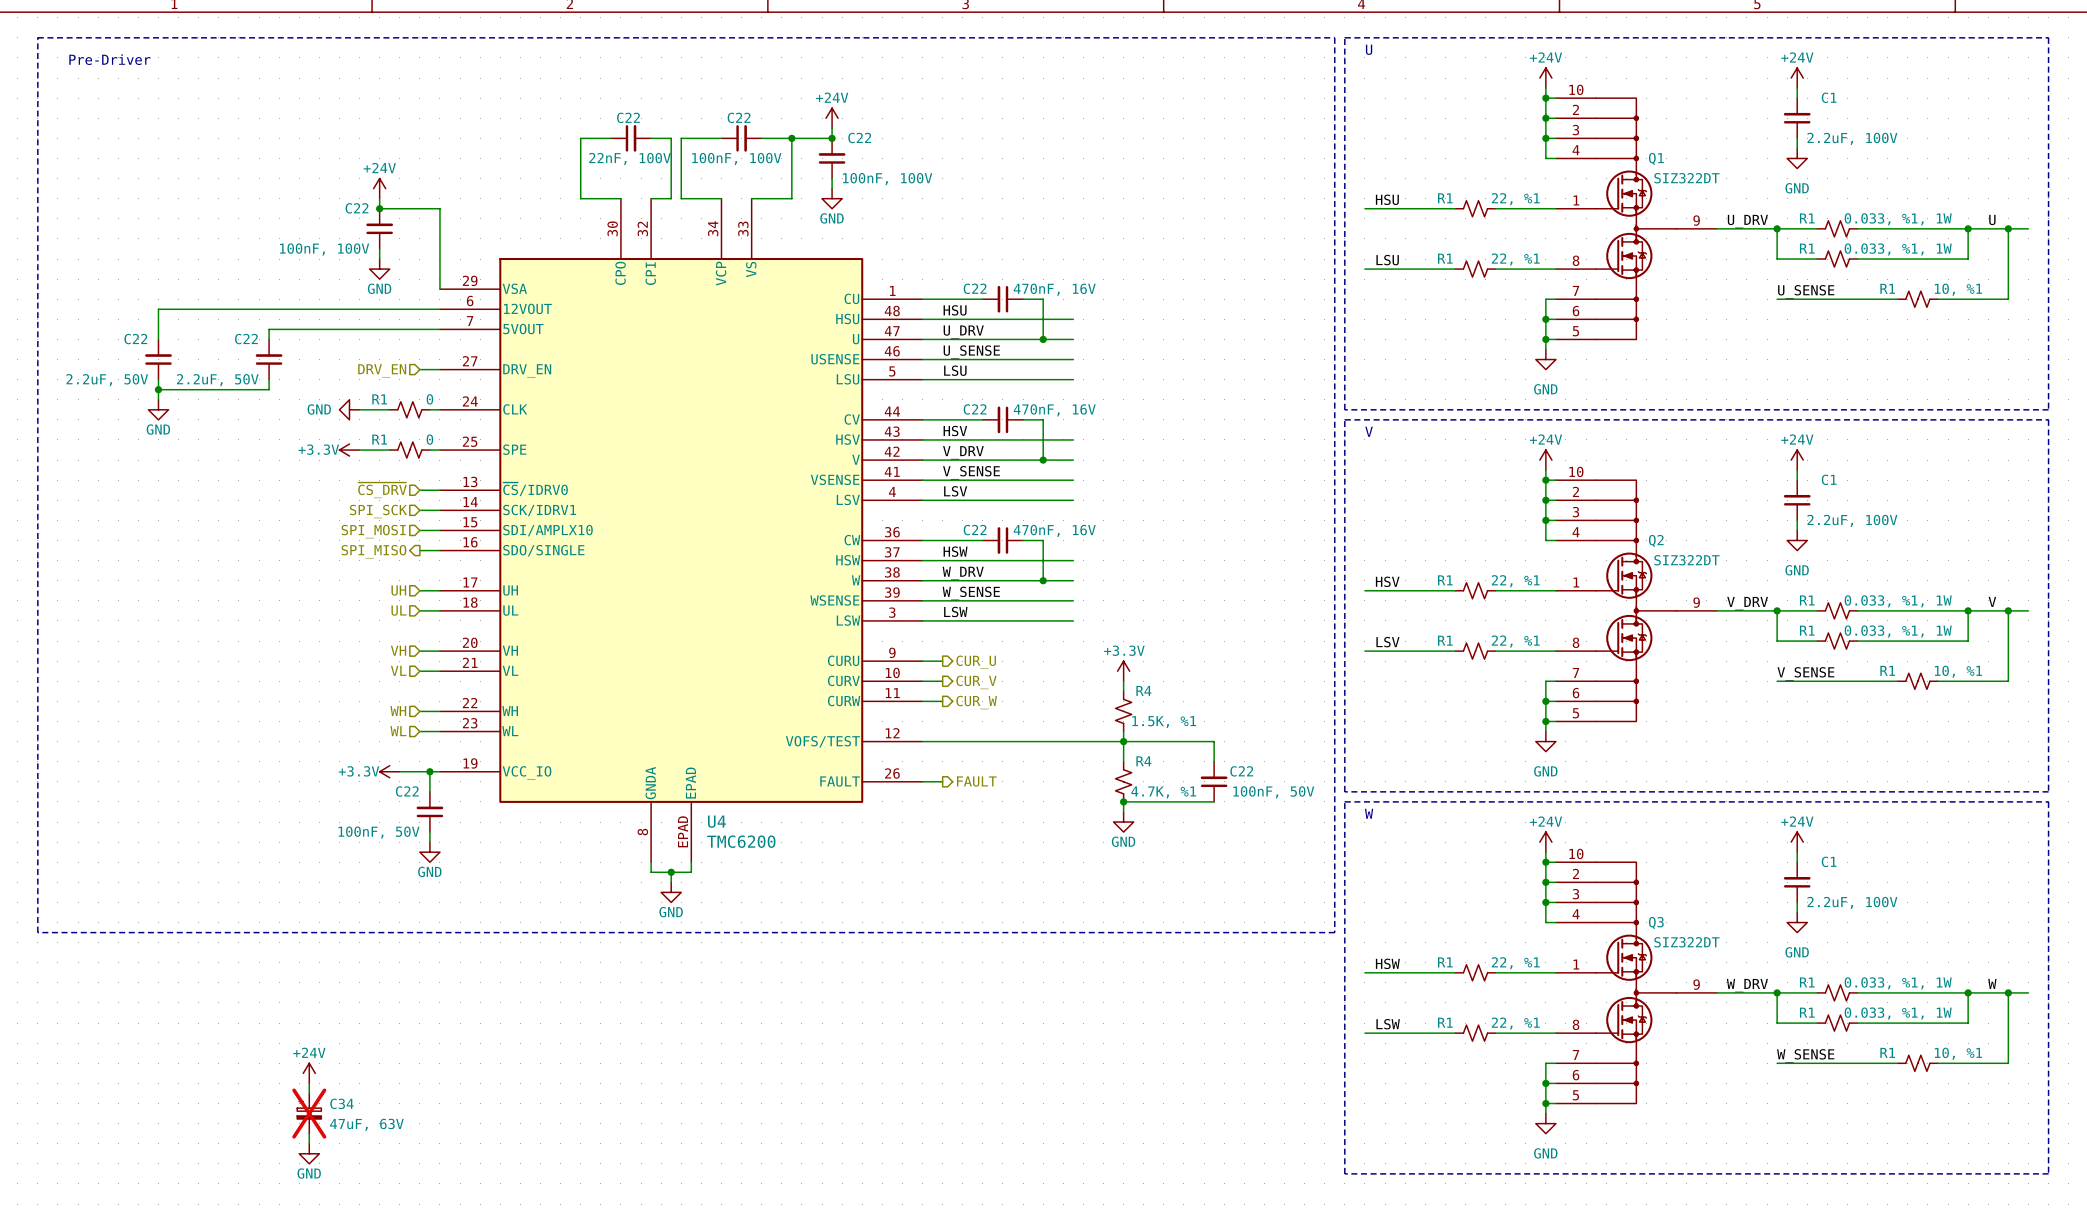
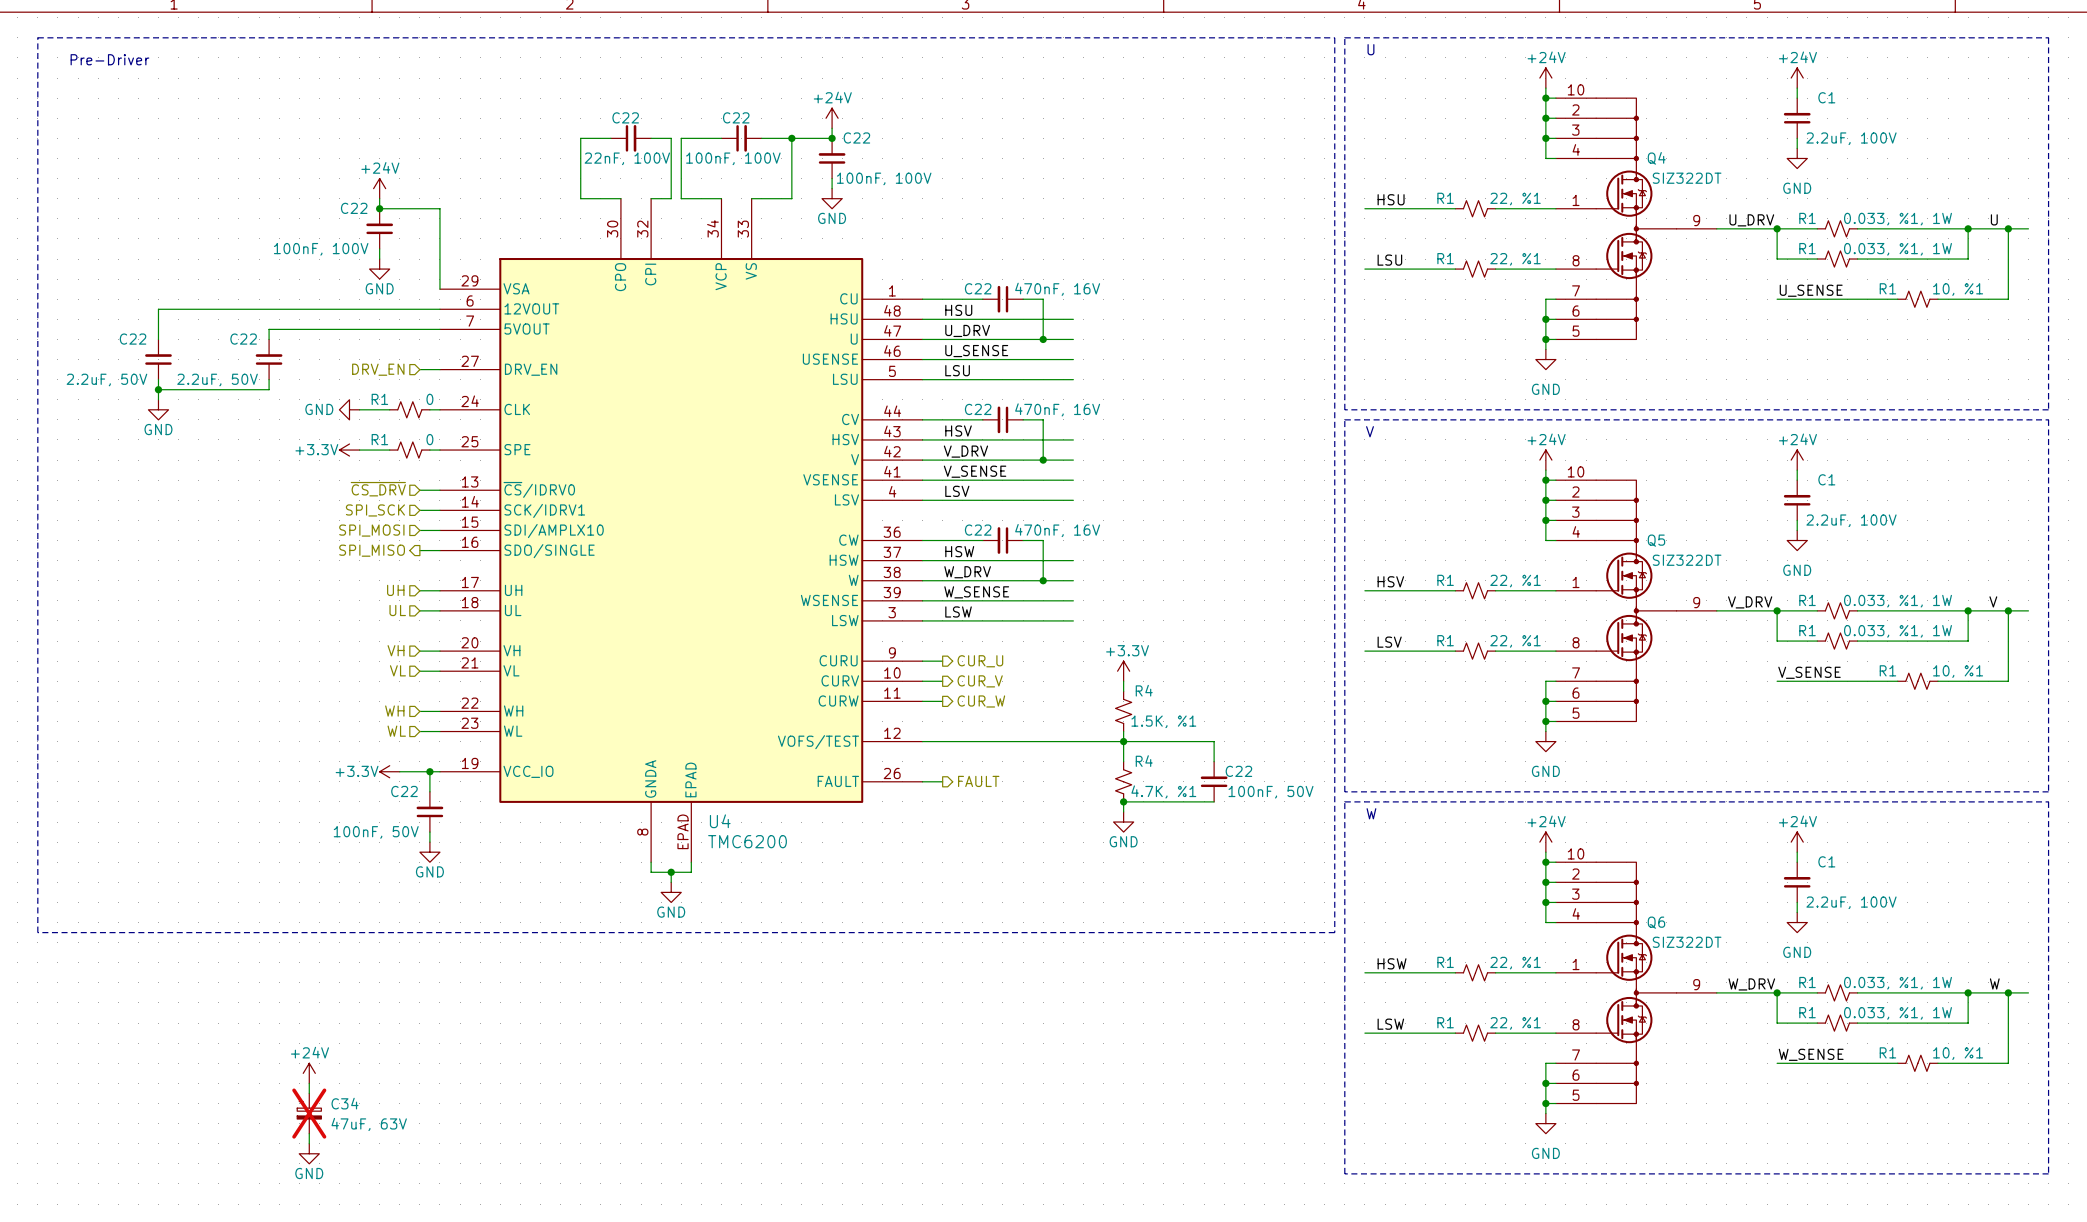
Q1 name: Q1 (1656, 158) -> Q4 (1656, 158)
Q2 name: Q2 (1656, 540) -> Q5 (1656, 540)
Q3 name: Q3 (1656, 922) -> Q6 (1656, 922)

